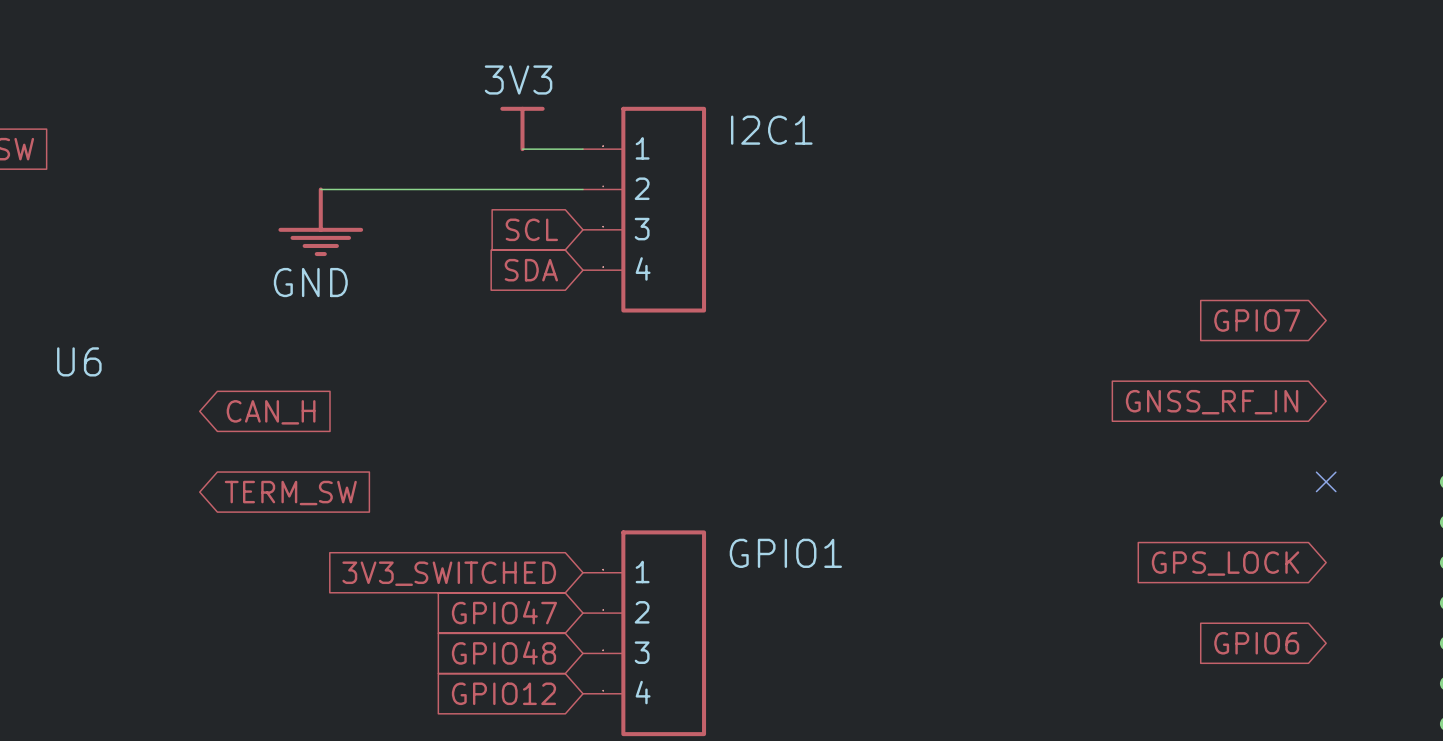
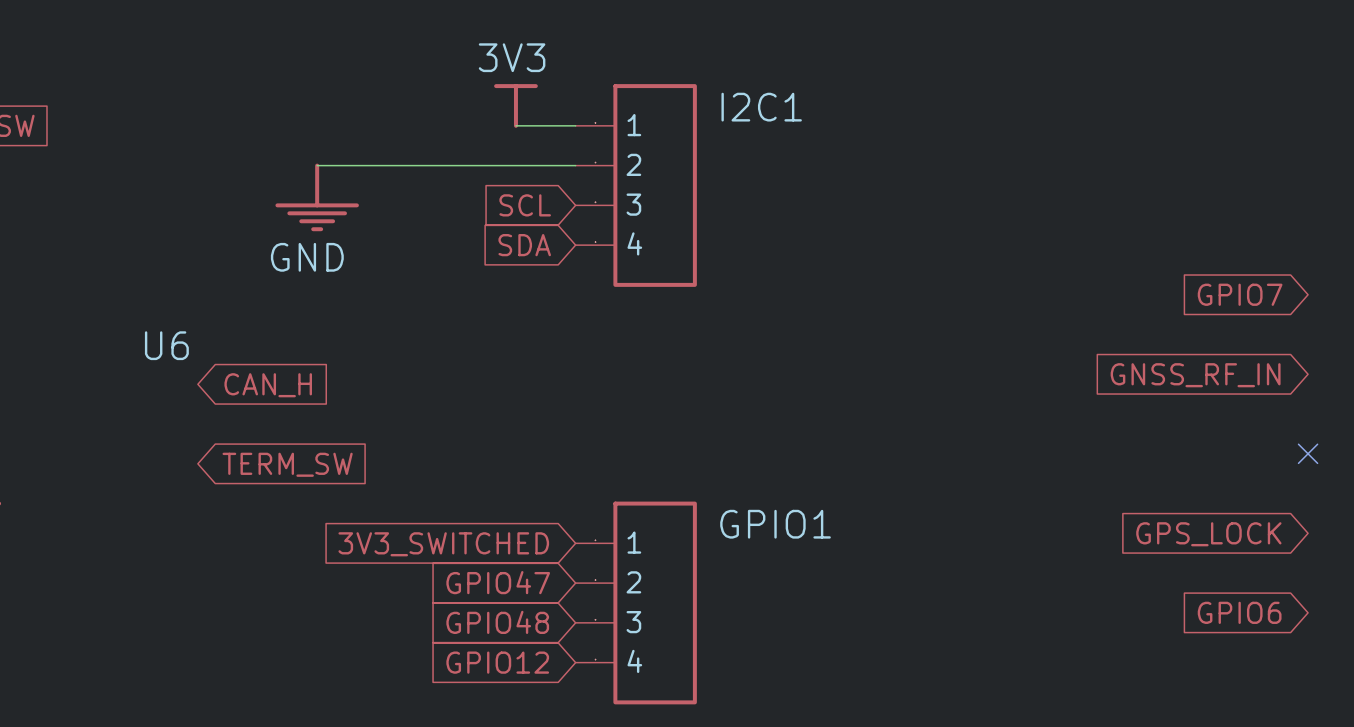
U6 position: (79, 361) -> (166, 345)

